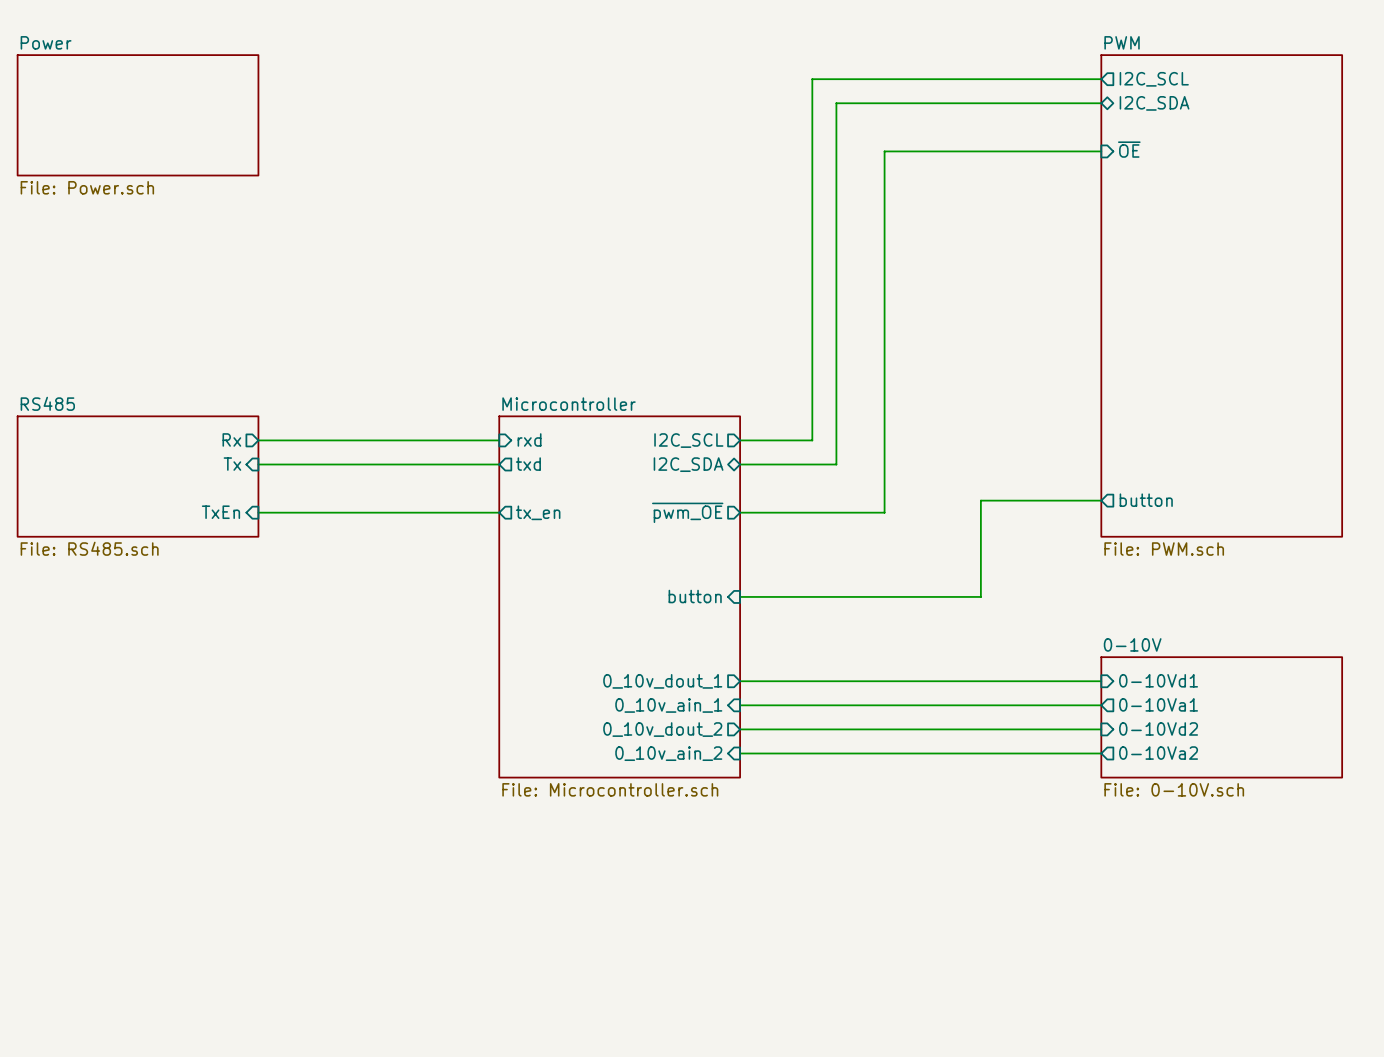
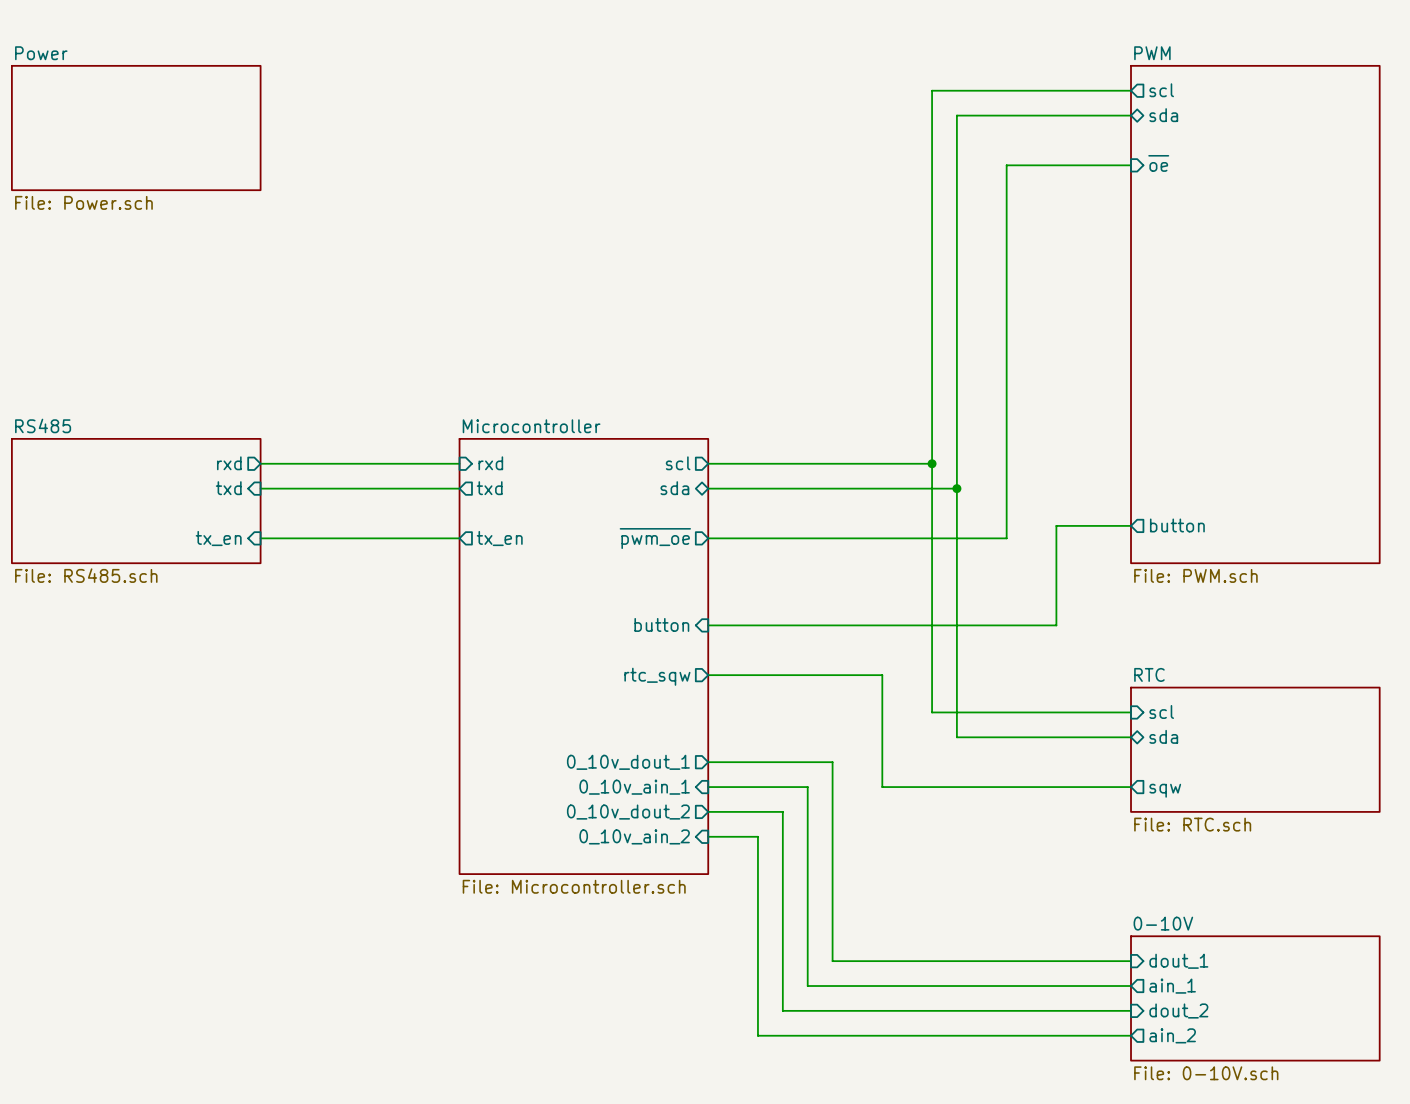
wire: (908, 79) (812, 79) (812, 440) -> (932, 90) (932, 712)
sheet pin: I2C_SCL (1154, 79) -> scl (1161, 90)
wire: (932, 103) (836, 103) (836, 464) -> (956, 115) (956, 737)
sheet pin: I2C_SDA (1154, 103) -> sda (1163, 115)
sheet pin: ~{OE} (1129, 149) -> ~{oe} (1158, 163)
wire: (980, 151) (884, 151) (884, 512) -> (1006, 165) (1006, 525)
sheet pin: Rx (231, 439) -> rxd (229, 463)
sheet pin position: rxd (529, 439) -> rxd (490, 463)
sheet pin: none -> scl (678, 463)
wire: (451, 440) (499, 440) -> none
sheet pin: I2C_SCL (688, 440) -> none
wire: none -> (708, 463) (757, 463)
wire: none -> (832, 463) (932, 463)
junction: none -> (932, 463)
sheet pin: Tx (232, 464) -> txd (228, 488)
wire: (451, 464) (499, 464) -> none
sheet pin position: txd (528, 464) -> txd (489, 488)
sheet pin: none -> sda (674, 488)
sheet pin: I2C_SDA (688, 464) -> none
wire: none -> (708, 488) (757, 488)
wire: none -> (857, 488) (956, 488)
junction: none -> (956, 488)
wire: (980, 500) (1029, 500) -> none
sheet pin: TxEn (220, 512) -> tx_en (218, 538)
wire: (451, 512) (499, 512) -> none
sheet pin position: tx_en (538, 512) -> tx_en (499, 538)
sheet pin: ~{pwm_OE} (687, 512) -> ~{pwm_oe} (655, 538)
wire: none -> (708, 538) (757, 538)
wire: none -> (907, 538) (1006, 538)
wire: (980, 512) (980, 596) -> (1056, 525) (1056, 625) (1006, 625)
sheet Microcontroller: File: Microcontroller.sch (619, 596) -> none
wire: none -> (708, 625) (757, 625)
sheet pin position: button (695, 596) -> button (661, 624)
sheet Microcontroller: none -> File: Microcontroller.sch (583, 656)
sheet 0-10V name: 0-10V (1132, 644) -> RTC (1149, 674)
sheet pin: none -> rtc_sqw (657, 676)
sheet pin: 0-10Vd1 (1158, 680) -> scl (1161, 711)
sheet pin position: 0_10v_dout_1 (662, 681) -> 0_10v_dout_1 (628, 762)
wire: (740, 681) (908, 681) -> none
sheet pin shape: output (1158, 704) -> bidirectional (1163, 736)
sheet pin: 0-10Va1 (1158, 704) -> sda (1163, 736)
sheet pin position: 0_10v_ain_1 (668, 705) -> 0_10v_ain_1 (634, 787)
wire: (740, 705) (932, 705) -> none
sheet pin: 0-10Vd2 (1158, 728) -> none
sheet pin position: 0_10v_dout_2 (662, 729) -> 0_10v_dout_2 (628, 812)
wire: none -> (708, 762) (757, 762)
wire: (812, 729) (1101, 729) -> (832, 762) (832, 961) (1131, 961)
sheet pin position: 0_10v_ain_2 (668, 753) -> 0_10v_ain_2 (634, 836)
wire: none -> (708, 787) (757, 787)
wire: (788, 753) (860, 753) -> (708, 675) (882, 675) (882, 787)
wire: none -> (807, 787) (807, 986) (1131, 986)
sheet pin: 0-10Va2 (1158, 753) -> sqw (1165, 790)
wire: none -> (708, 811) (782, 811) (782, 1010) (1131, 1010)
sheet 0-10V value: File: 0-10V.sch (1174, 789) -> File: RTC.sch (1192, 824)
wire: none -> (708, 836) (757, 836) (757, 1035) (1131, 1035)
sheet pin: none -> dout_1 (1178, 961)
sheet pin: none -> ain_1 (1172, 986)
sheet 0-10V: none -> File: 0-10V.sch (1255, 998)
sheet pin: none -> dout_2 (1178, 1011)
sheet pin: none -> ain_2 (1172, 1035)

